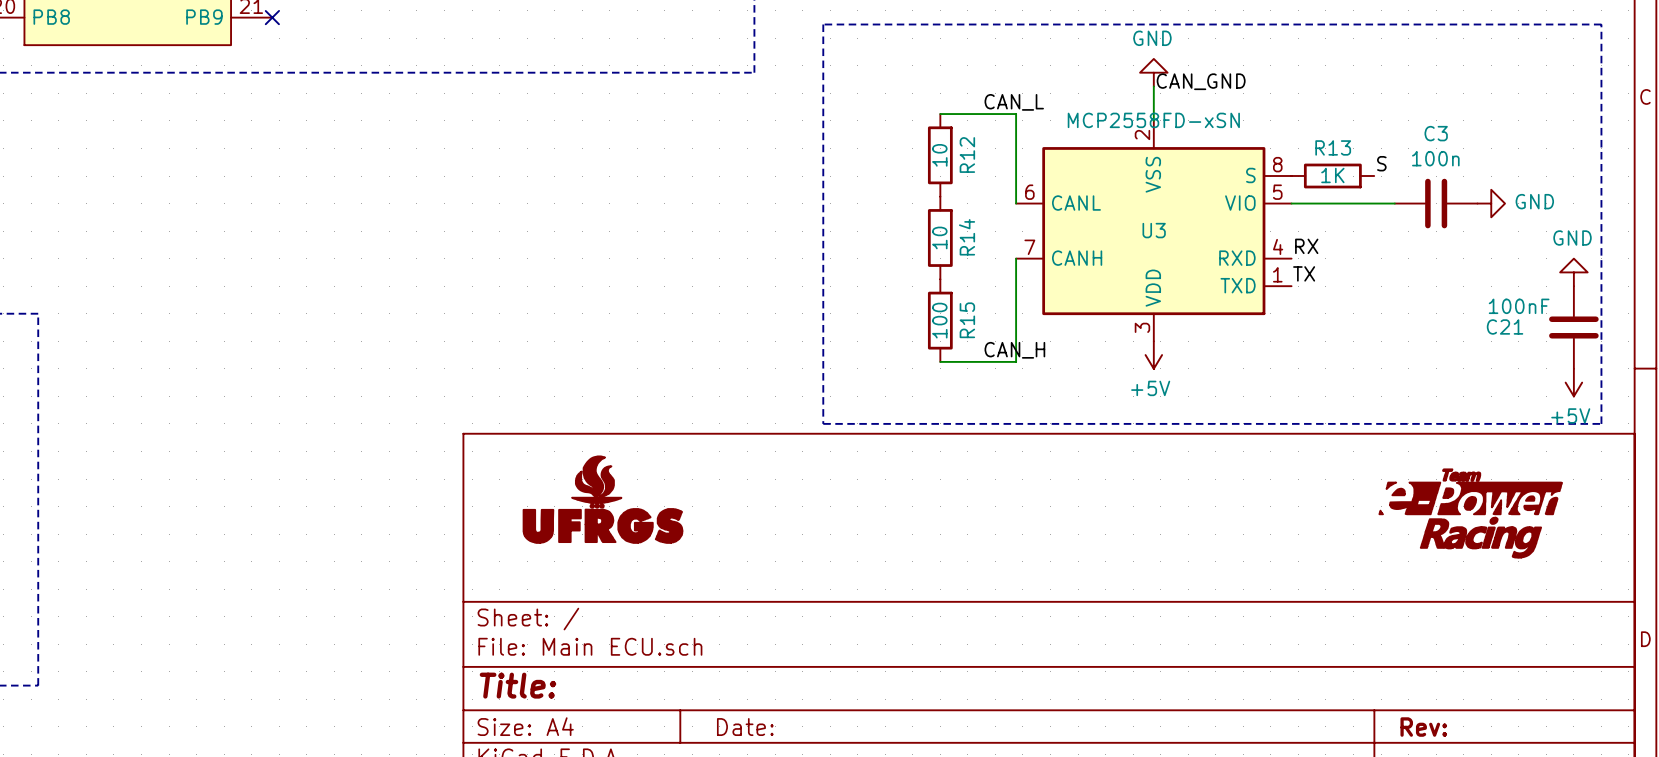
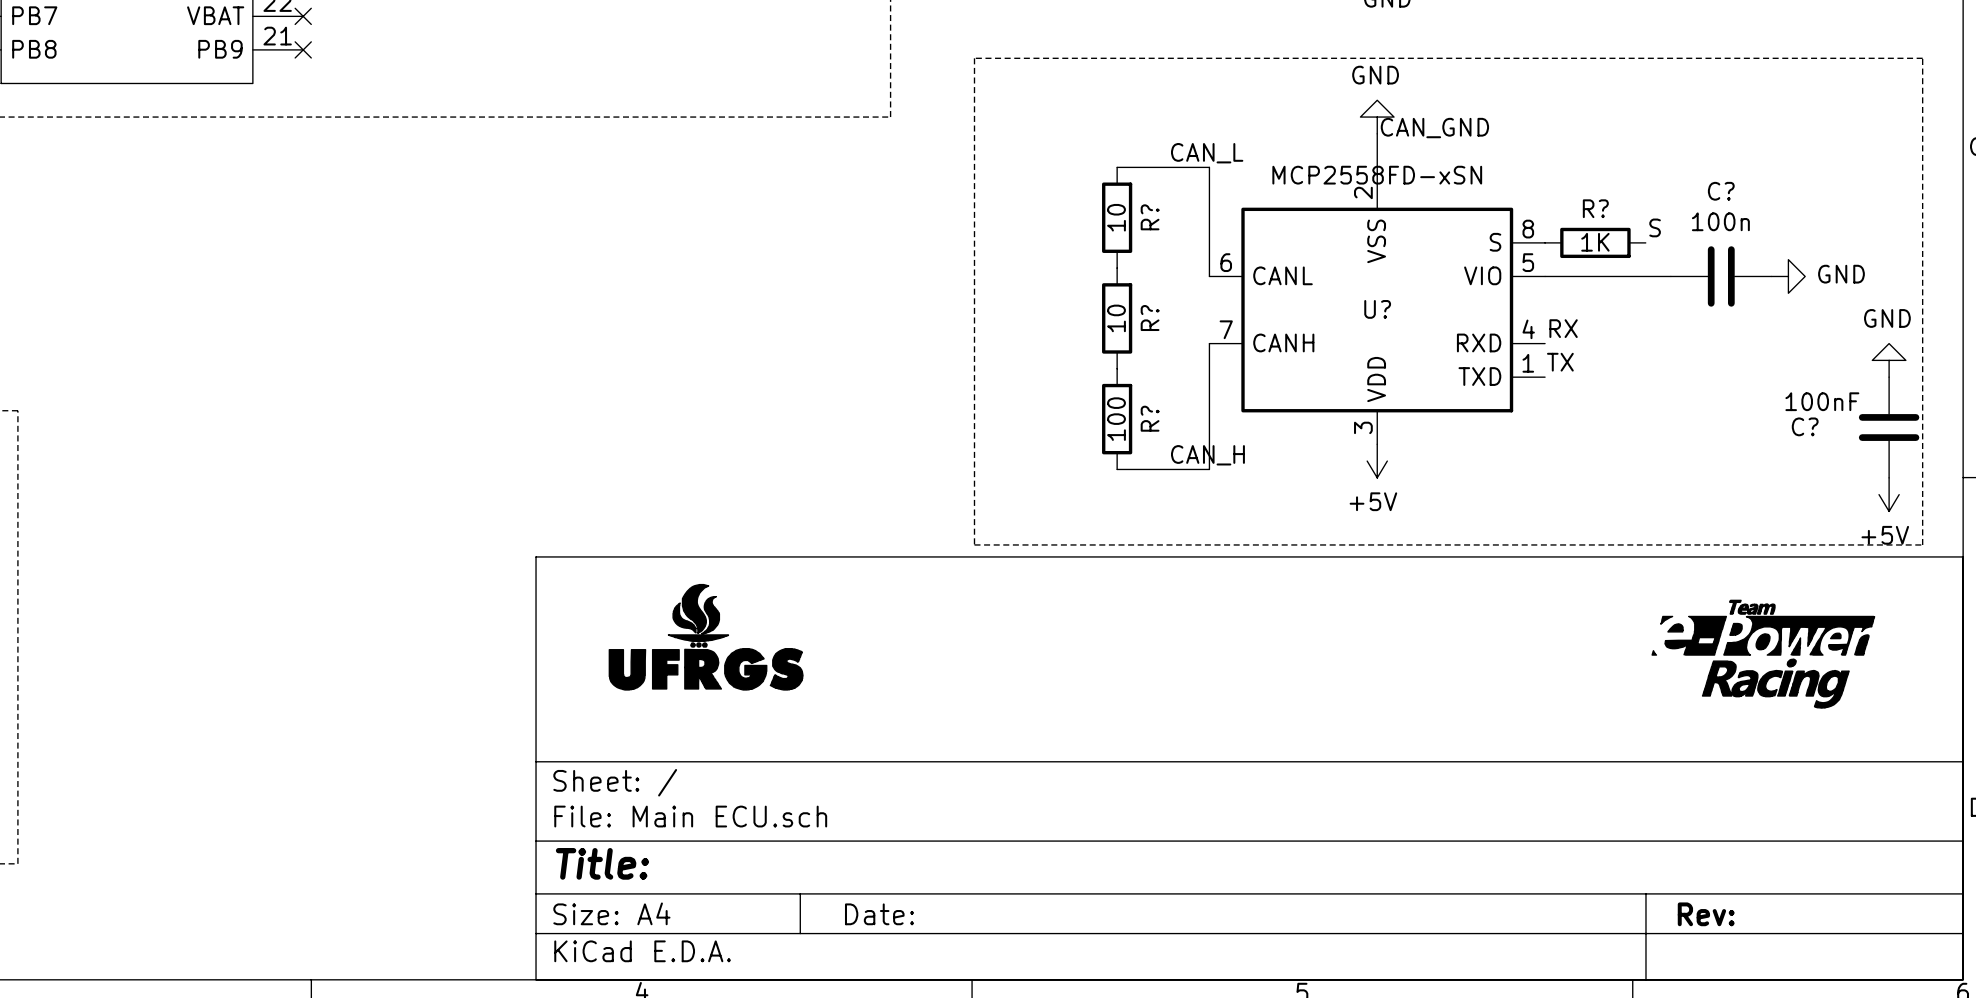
C3 name: C3 (1436, 133) -> C? (1721, 191)
R13 name: R13 (1333, 147) -> R? (1595, 208)
R12 name: R12 (967, 155) -> R? (1150, 217)
U3 name: U3 (1154, 230) -> U? (1377, 309)
R14 name: R14 (967, 237) -> R? (1150, 318)
R15 name: R15 (967, 320) -> R? (1150, 418)
C21 name: C21 (1505, 326) -> C? (1805, 426)

